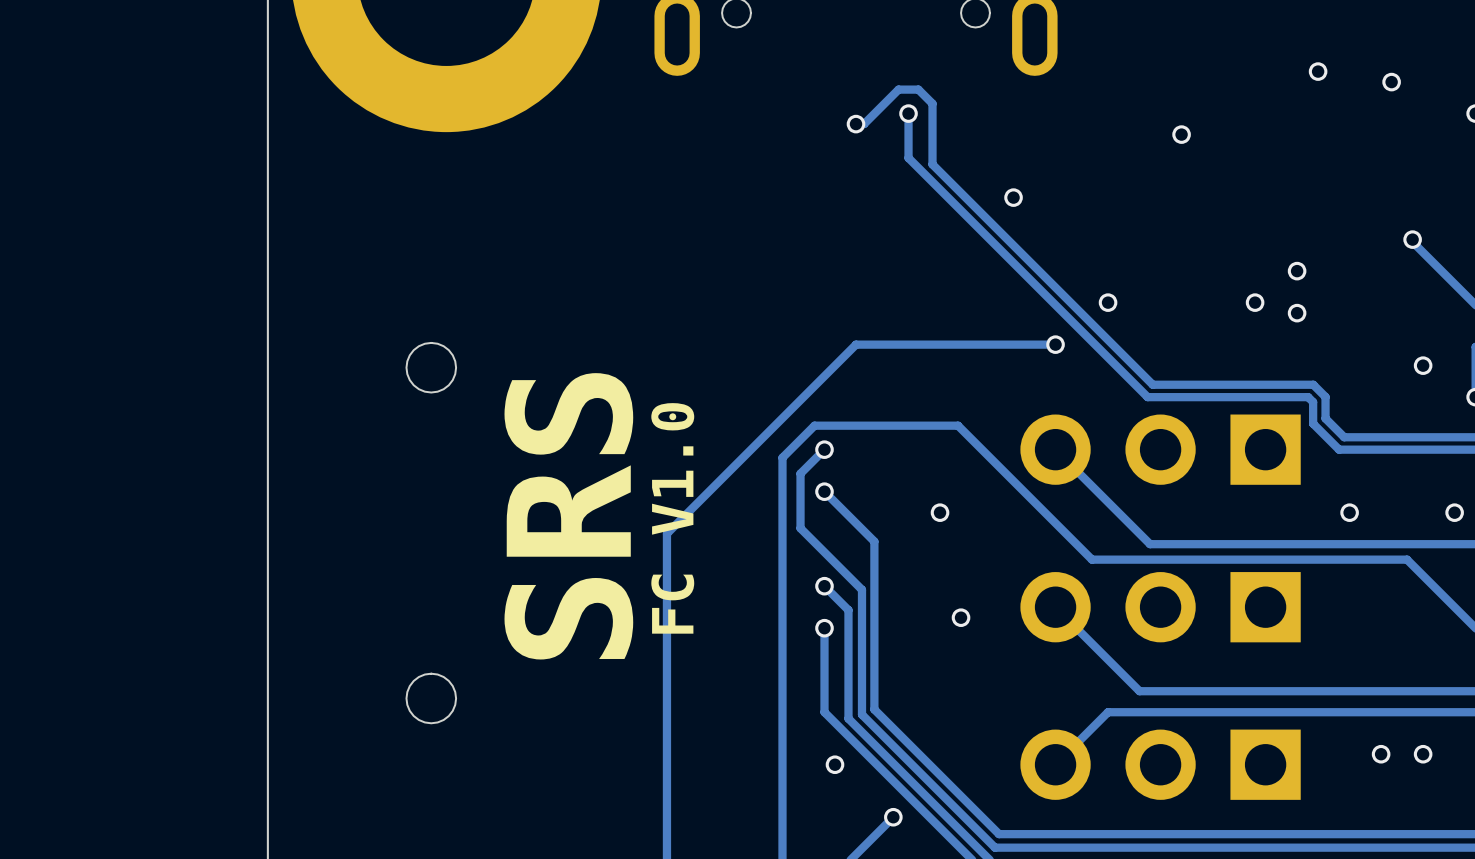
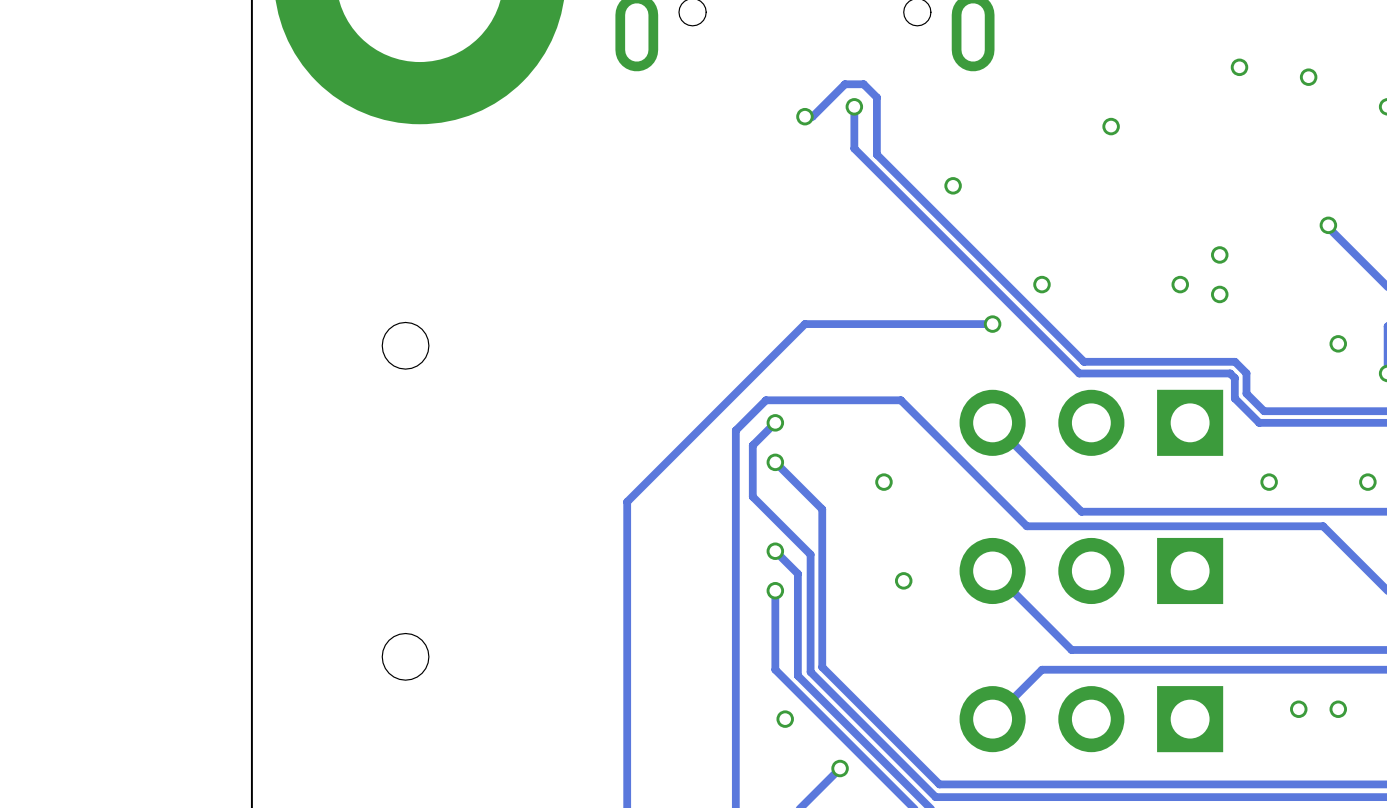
text: SRS (568, 516) -> none
text: FC V1.0 (672, 518) -> none

